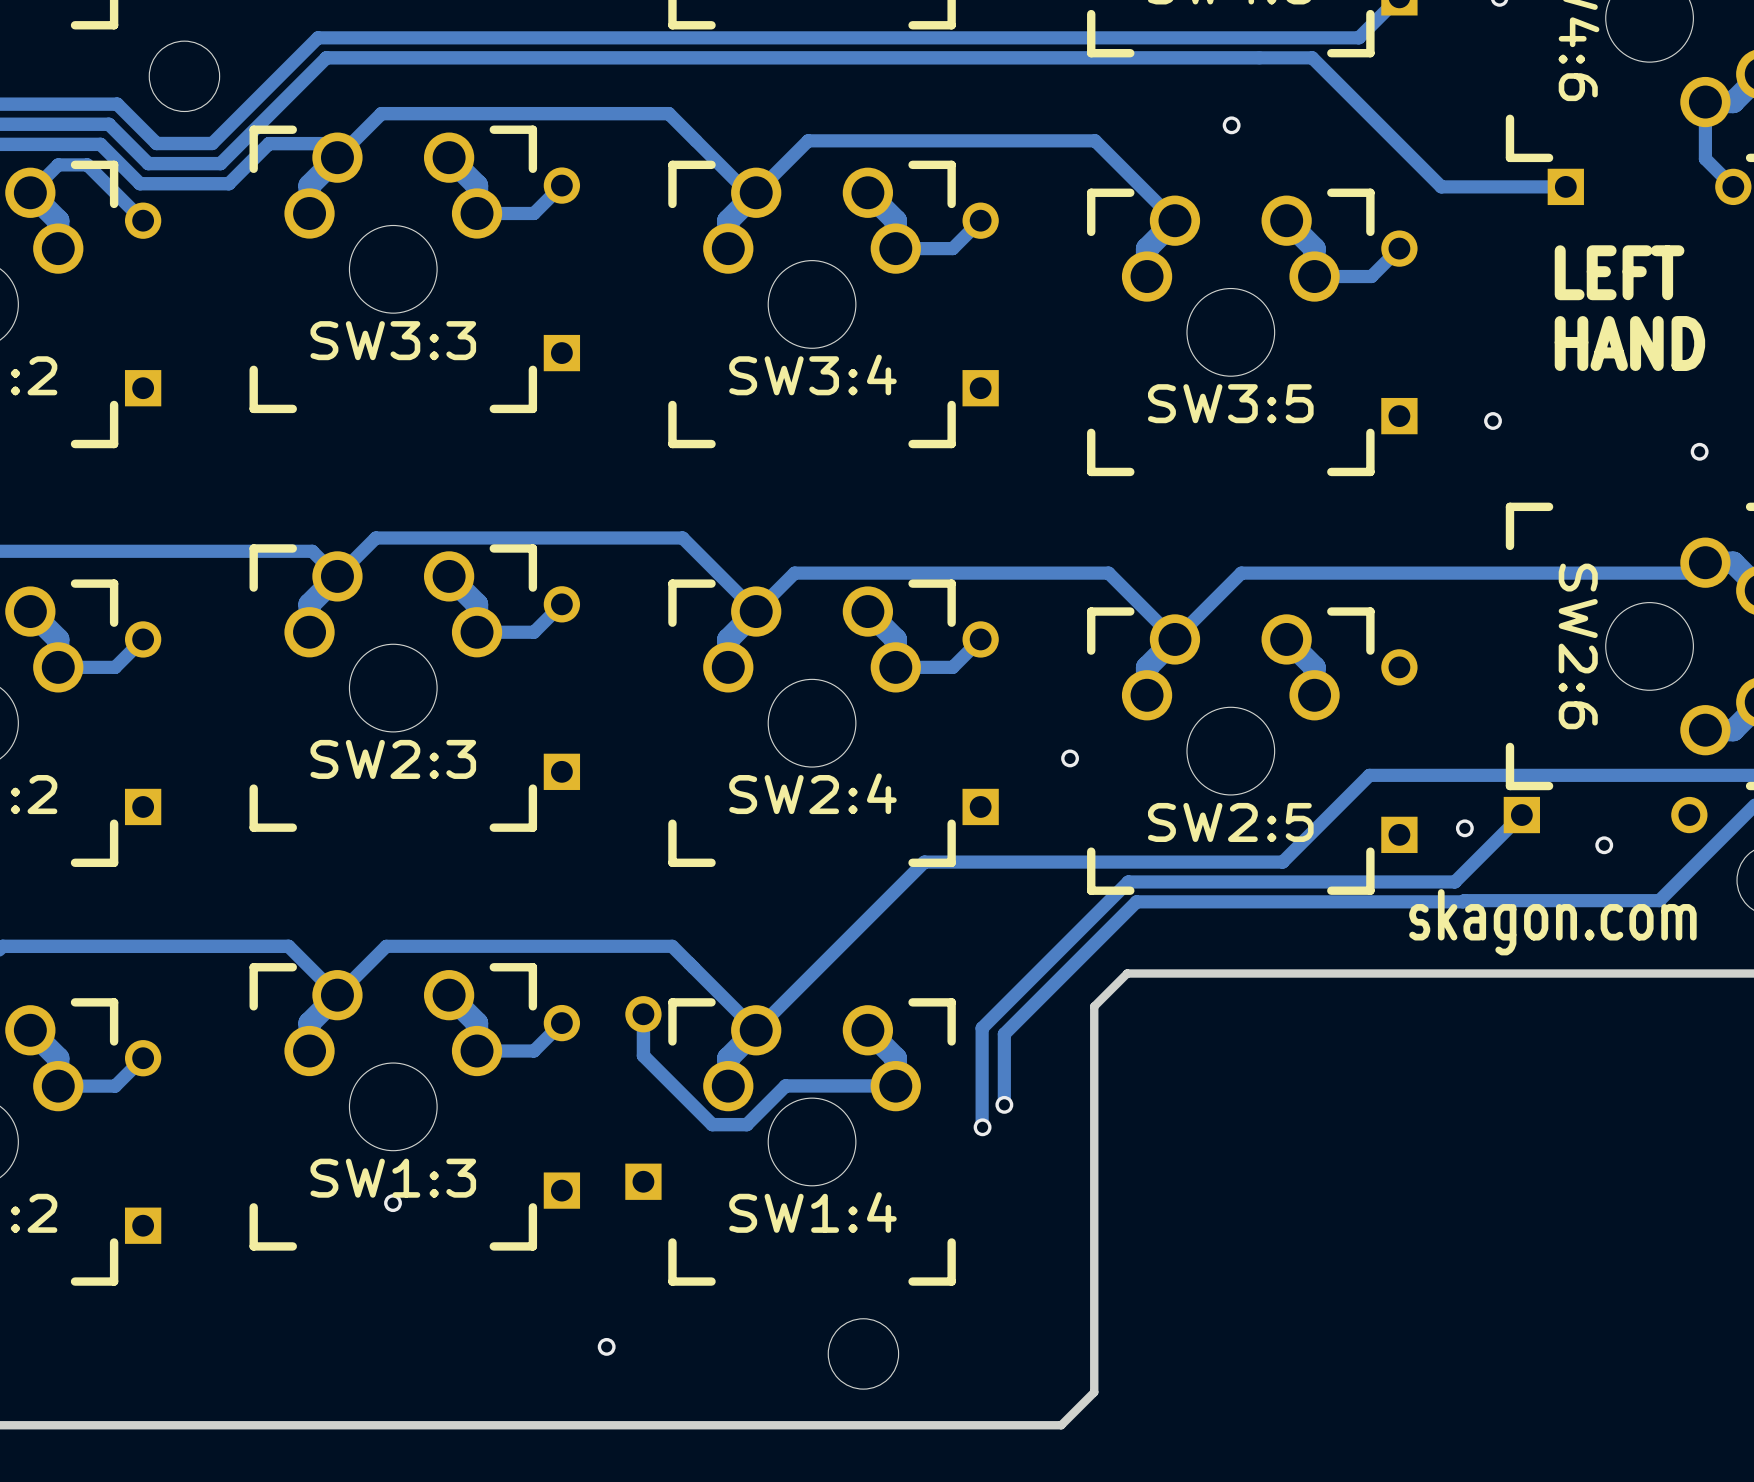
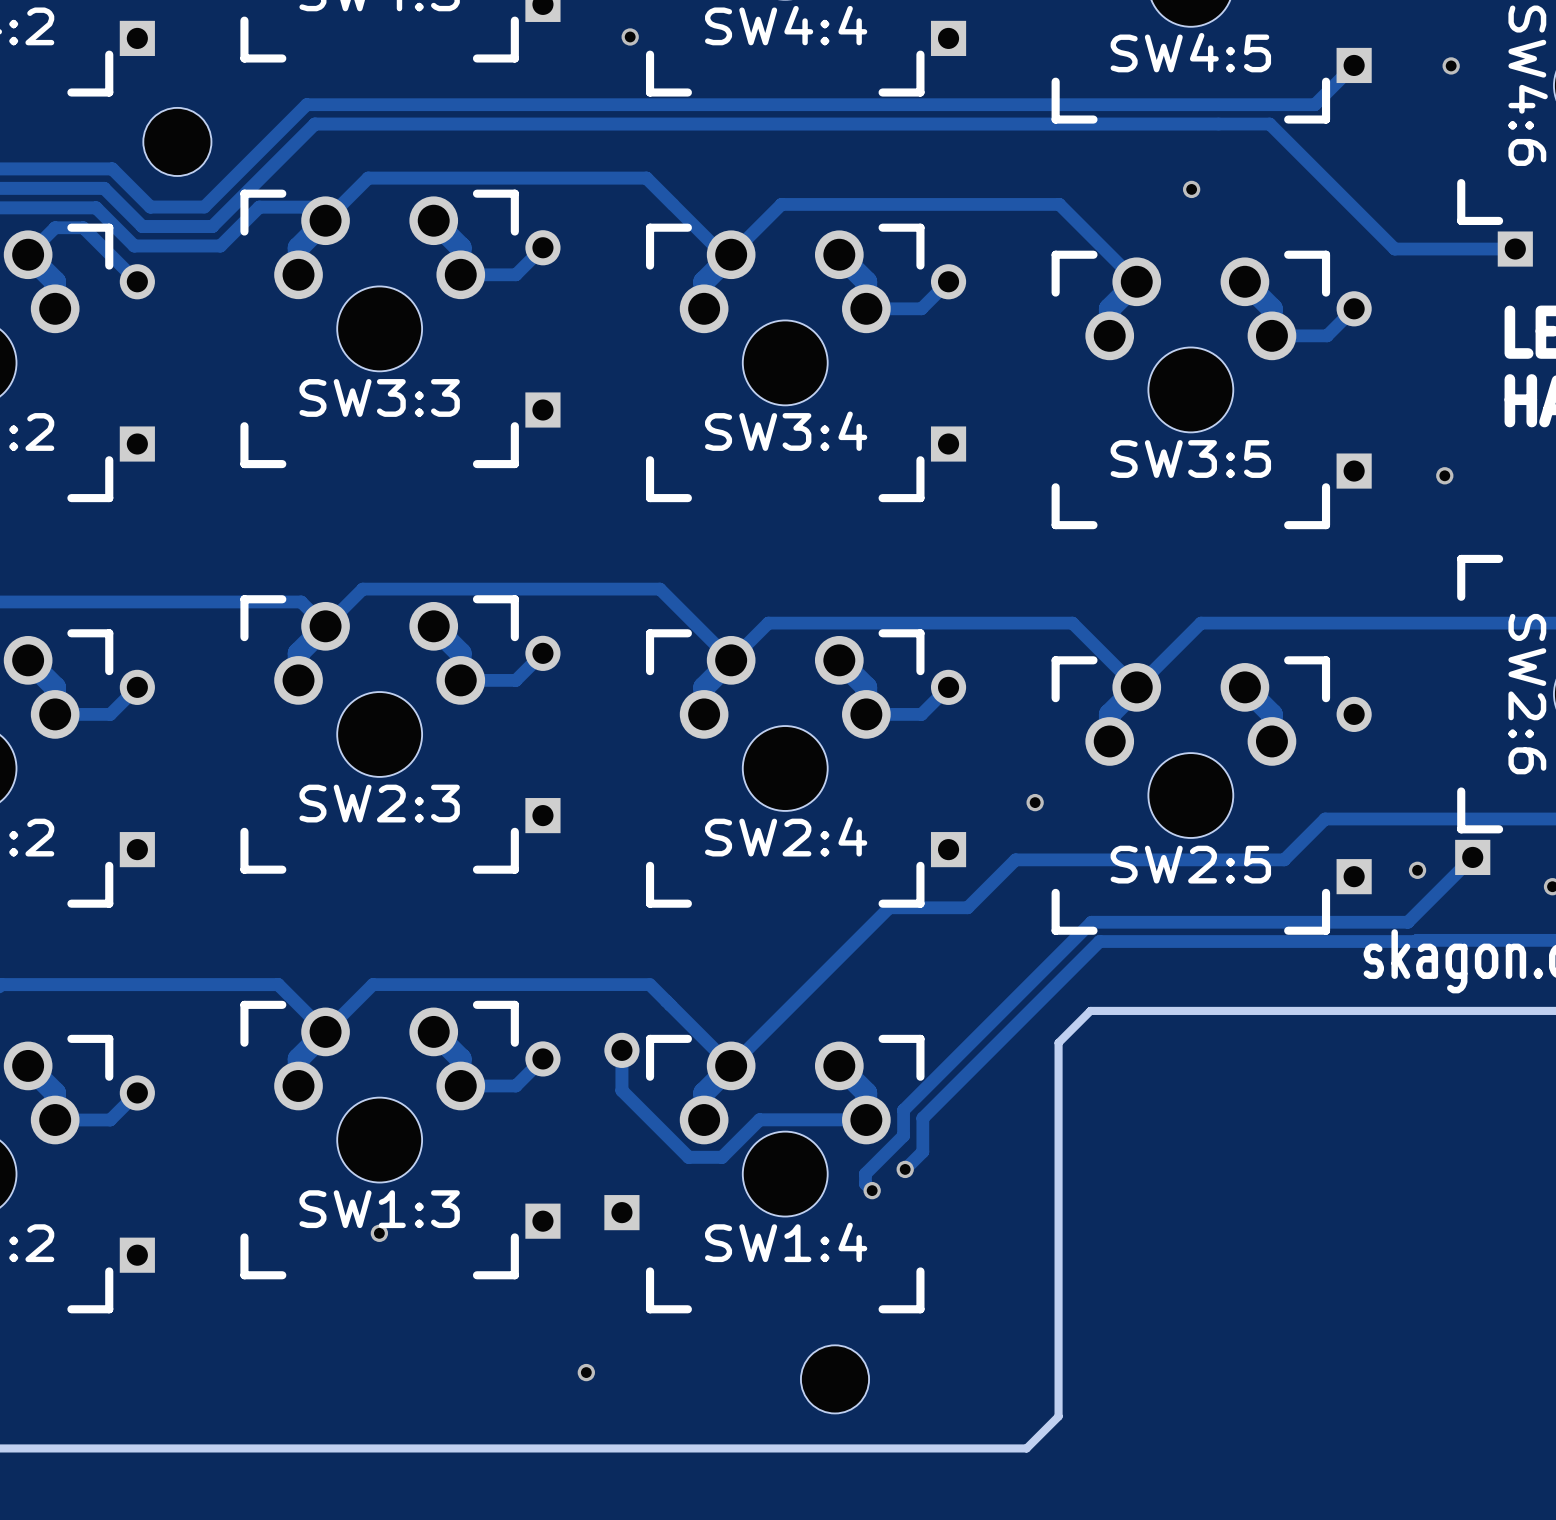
track: (1327, 817) (1282, 862) (924, 862) (919, 867) -> (1284, 859) (1015, 859) (967, 907) (889, 907)
track: (982, 1028) (982, 1127) -> (949, 1063) (903, 1110) (903, 1135) (865, 1173) (865, 1183) (872, 1190)
track: (1004, 1034) (1004, 1104) -> (971, 1069) (922, 1118) (922, 1151) (905, 1169)
via: (1004, 1104) -> none
via: (982, 1127) -> none
via: none -> (905, 1169)
via: none -> (872, 1190)

